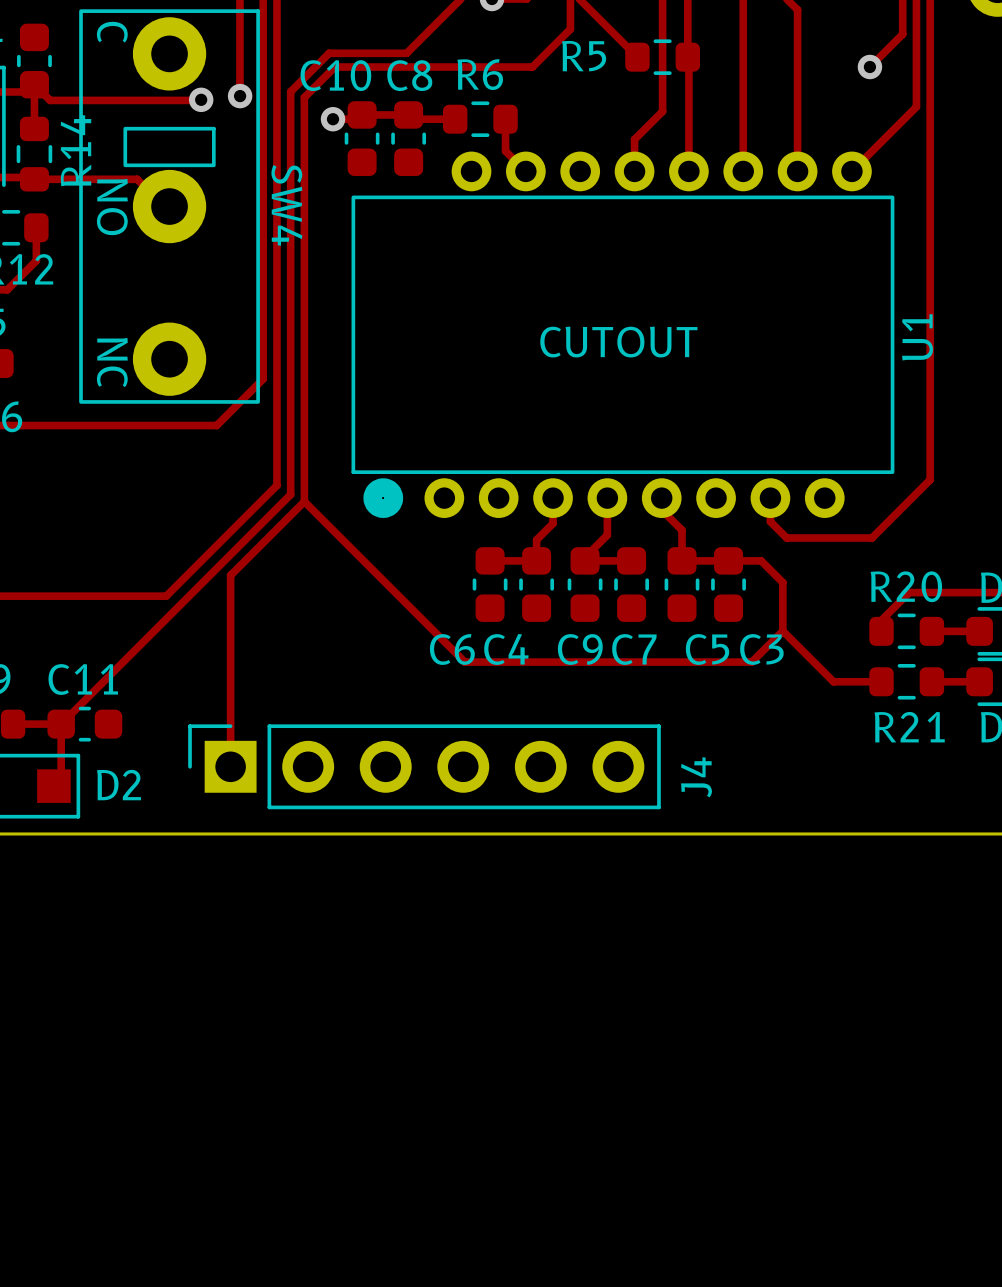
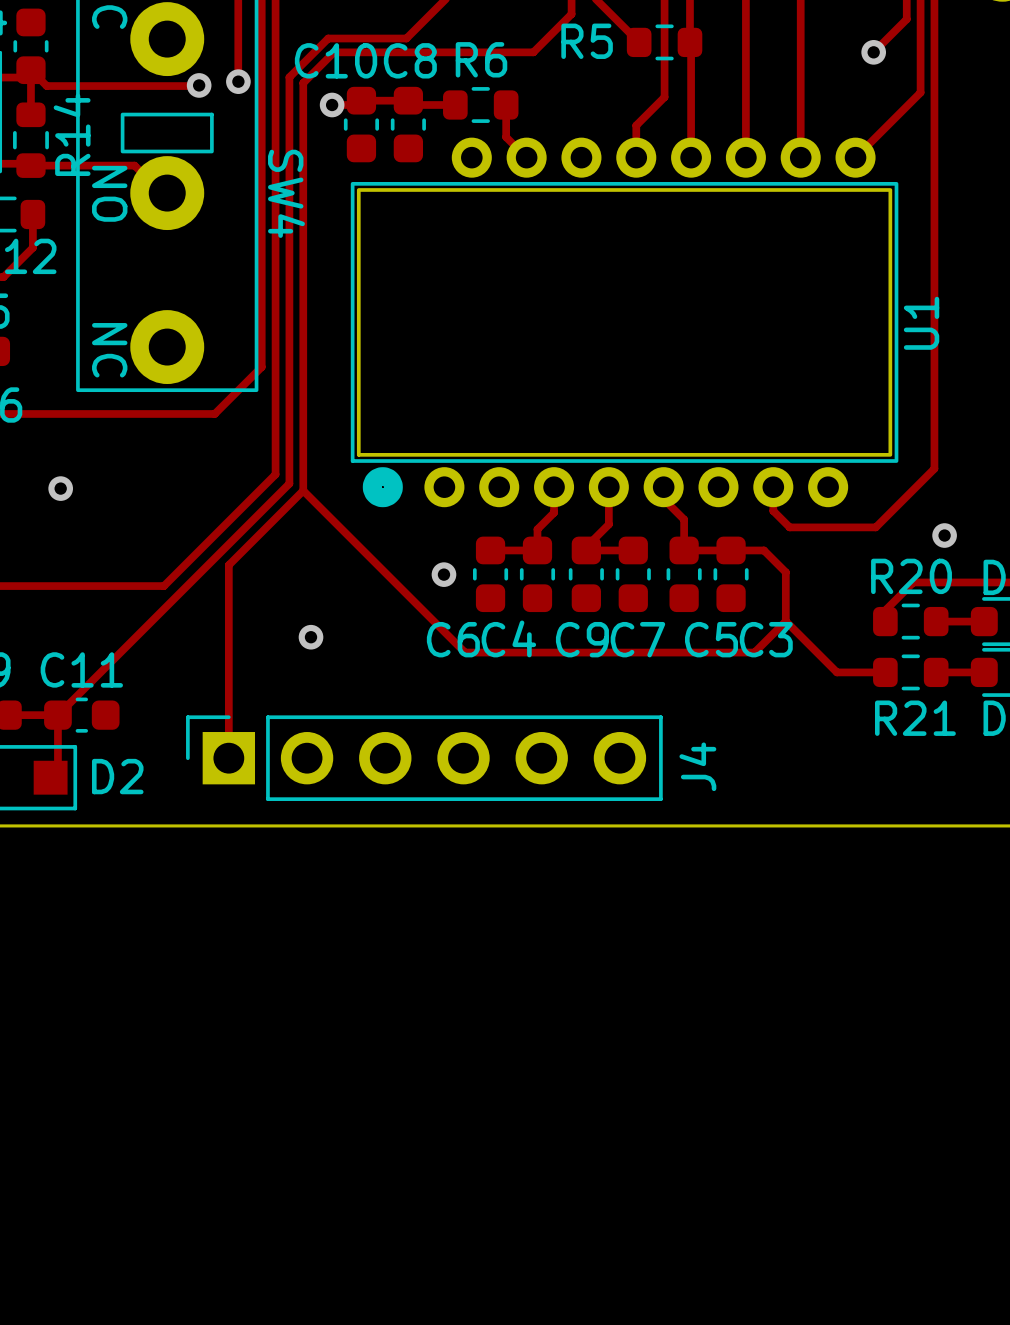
U1 footprint: [351, 151, 895, 518] -> [350, 137, 899, 508]
via: none -> (60, 488)
via: none -> (944, 535)
via: none -> (443, 574)
via: none -> (311, 637)

